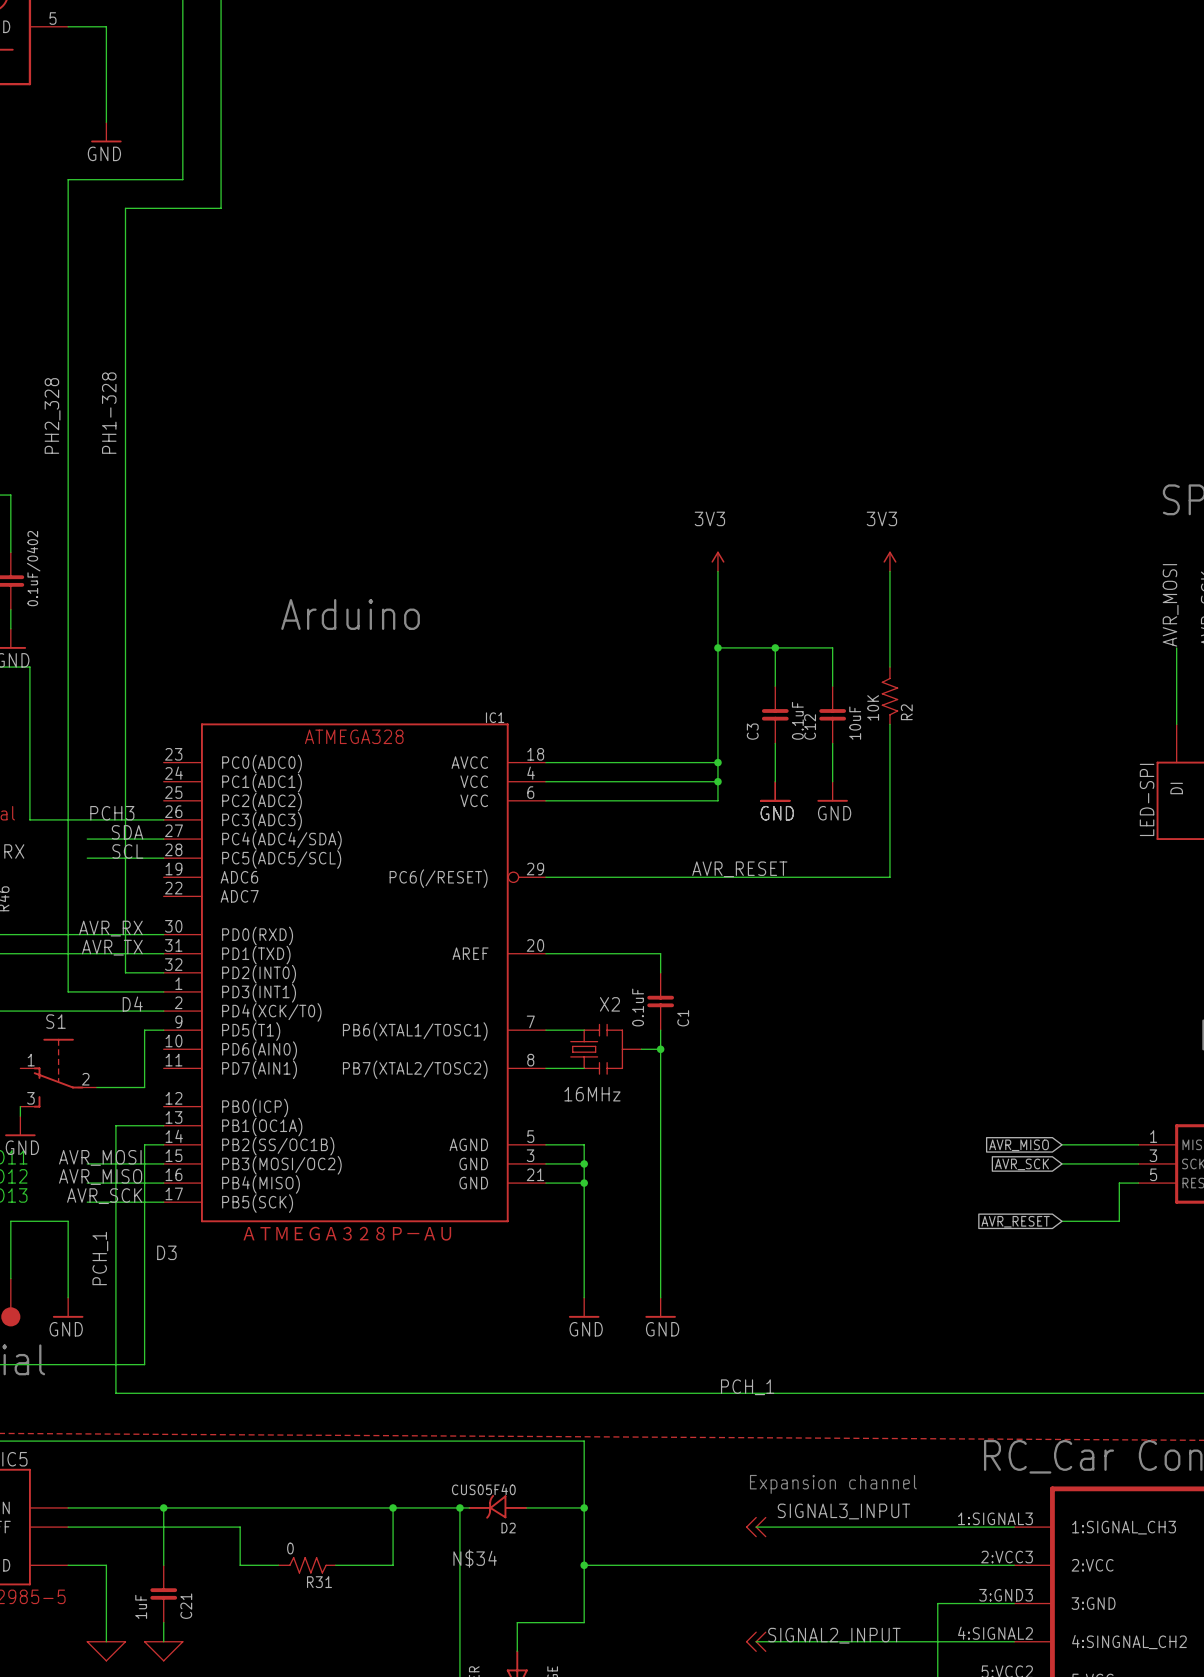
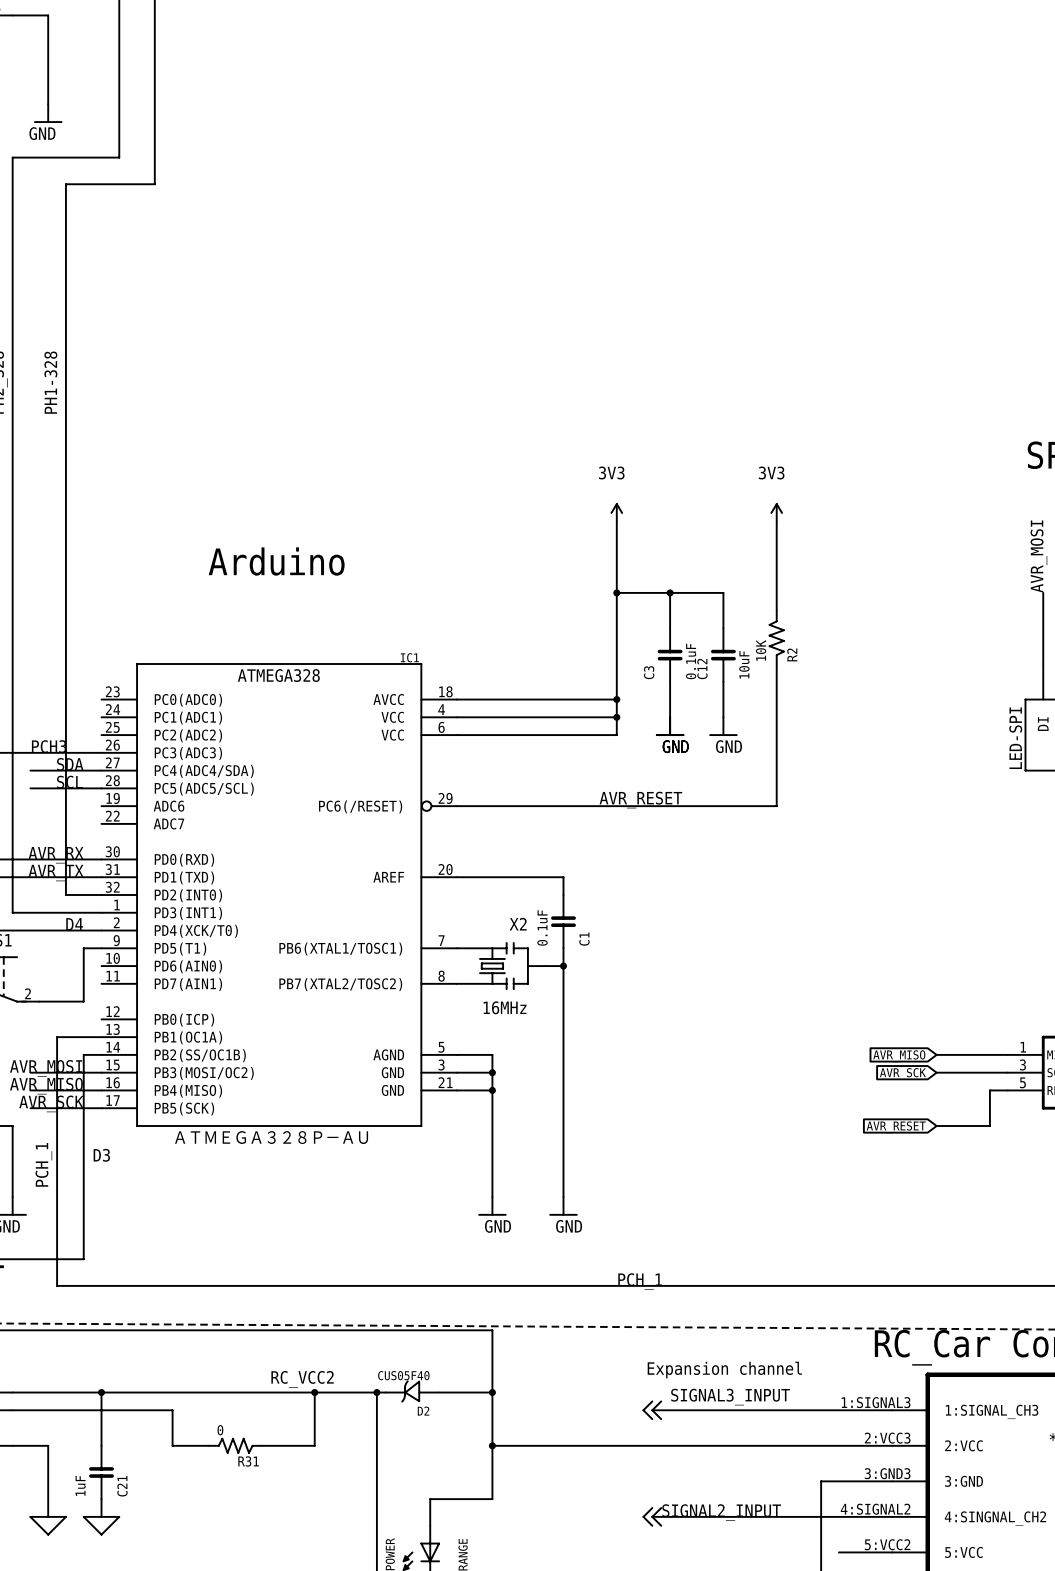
label: none -> RC_VCC2 (302, 1379)
label: N$34 (475, 1558) -> none

